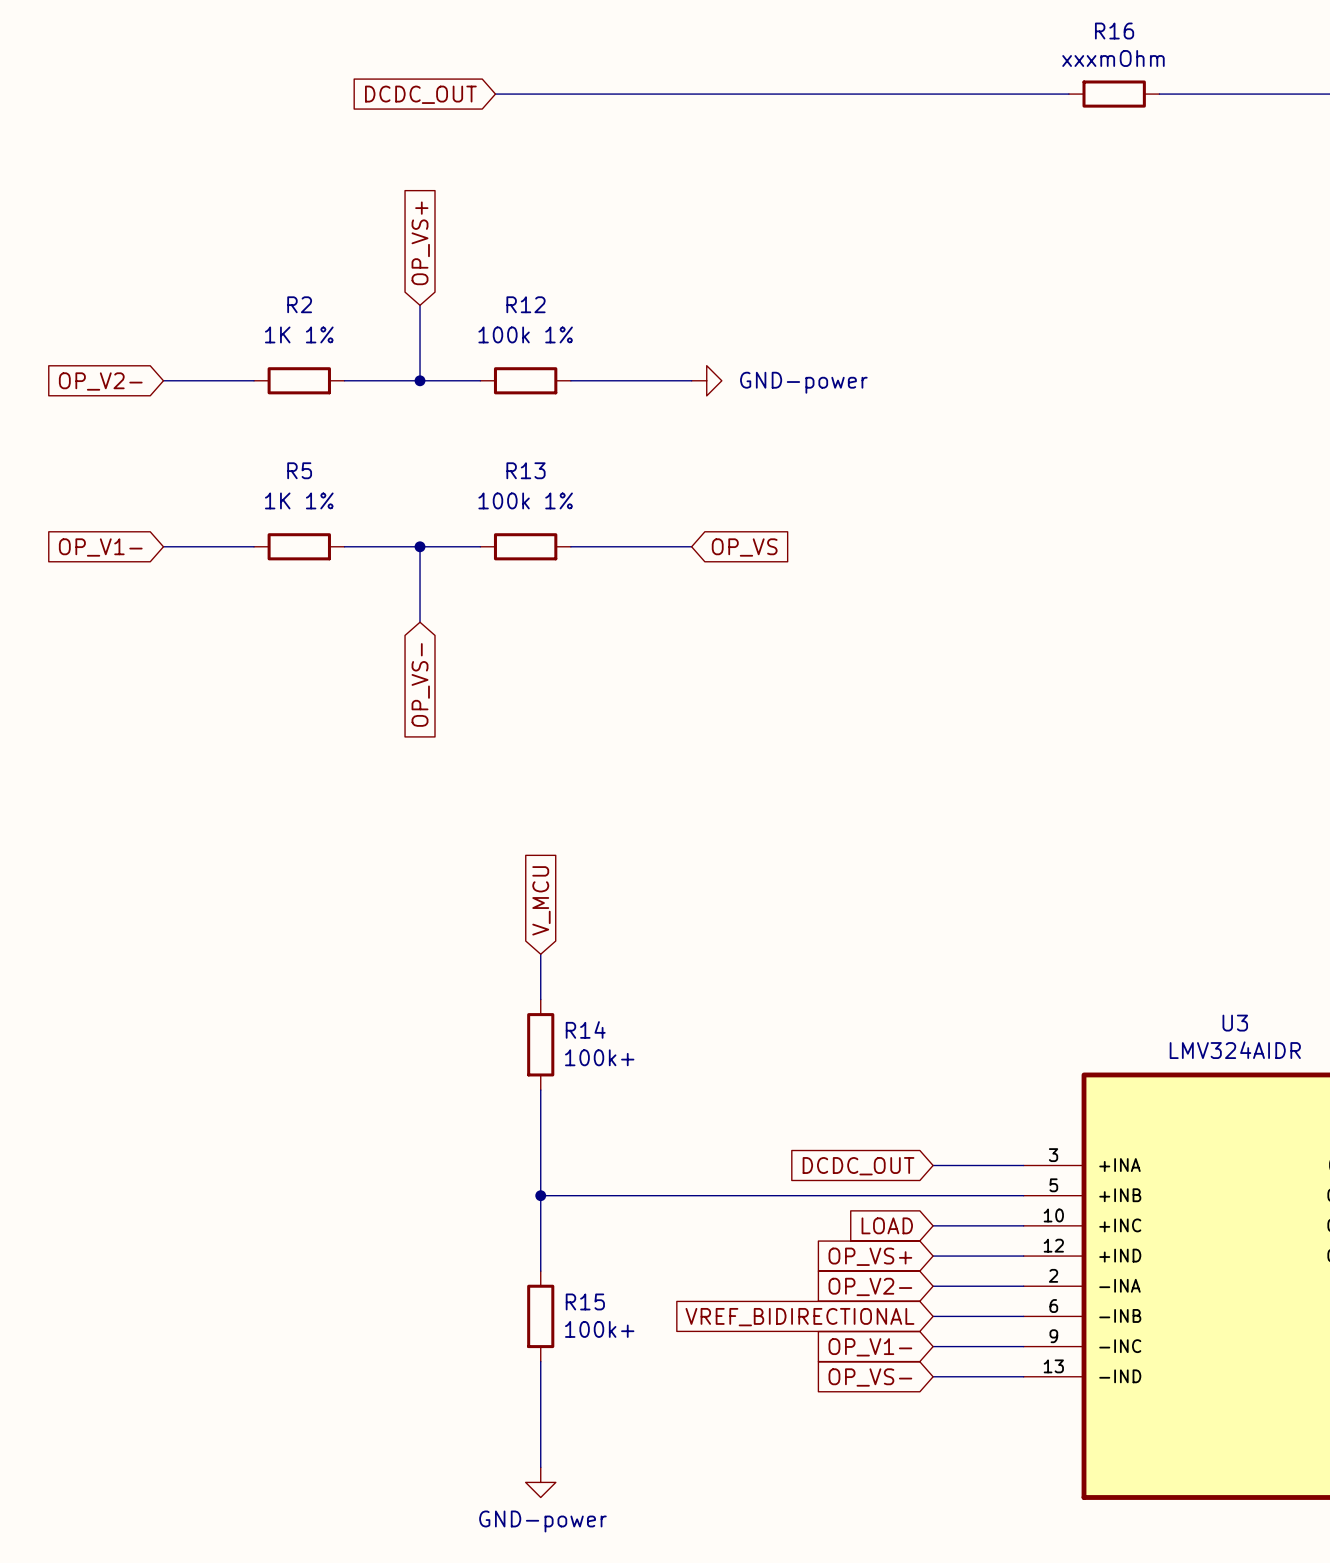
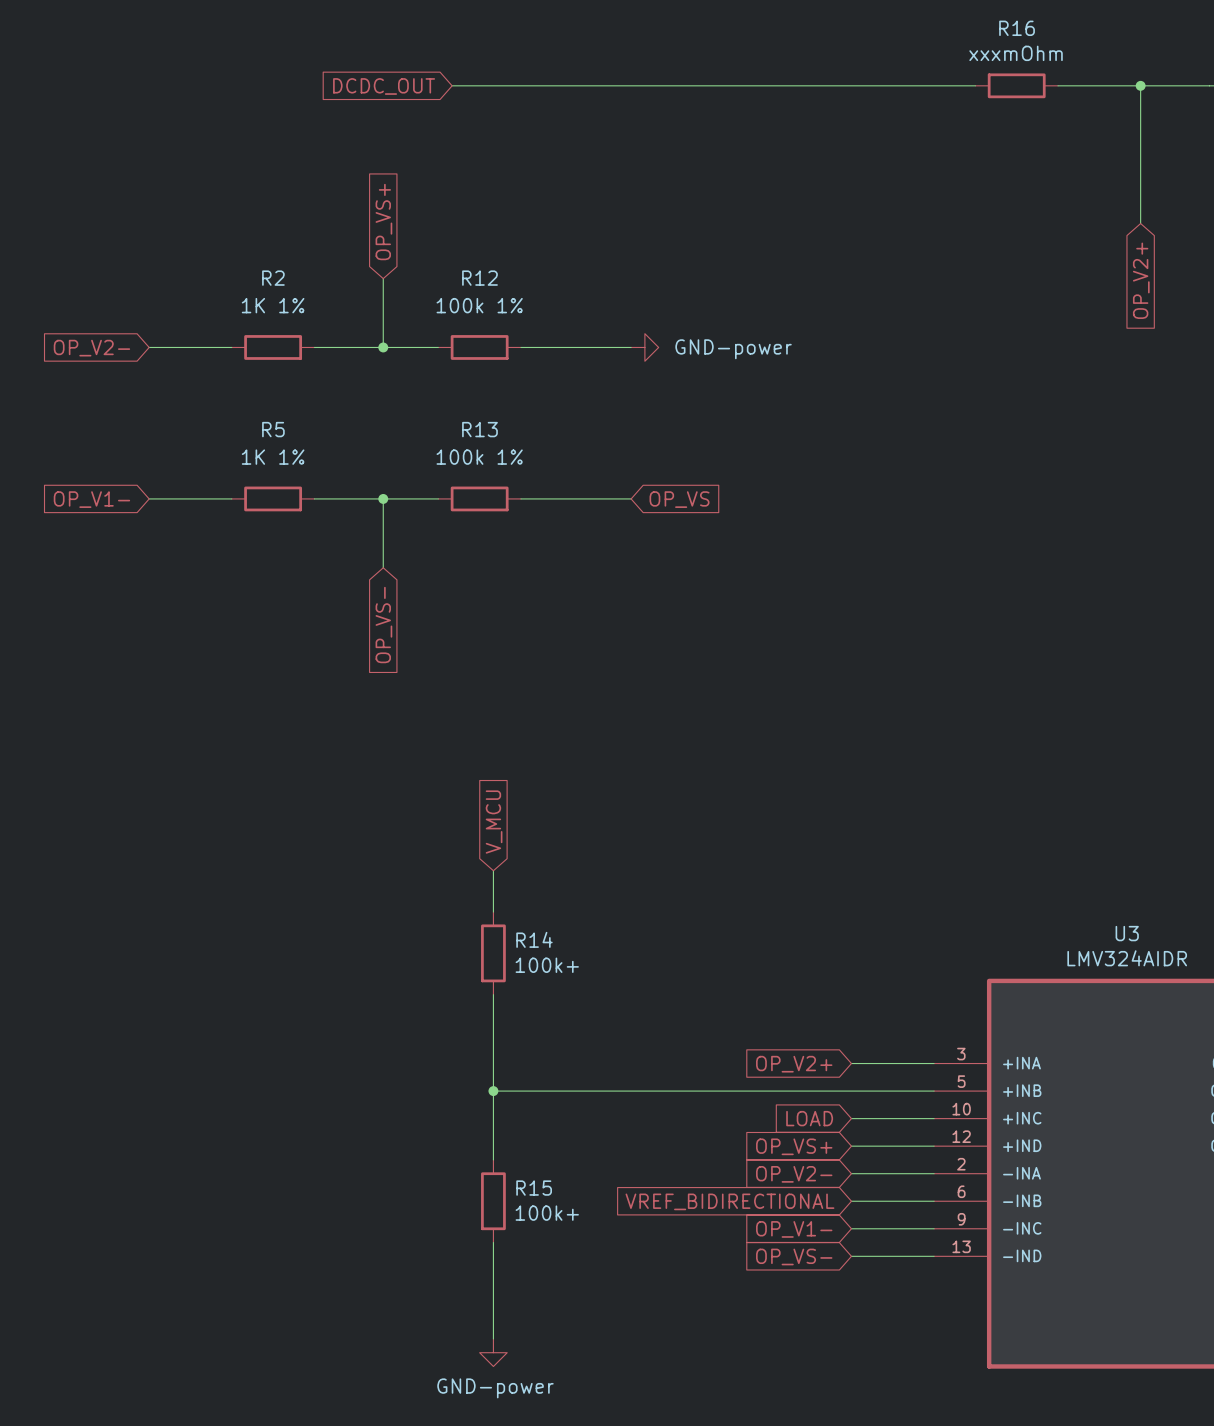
wire: none -> (1140, 85) (1140, 223)
junction: none -> (1140, 85)
global label: none -> OP_V2+ (1141, 280)
global label: DCDC_OUT (858, 1166) -> OP_V2+ (794, 1064)

